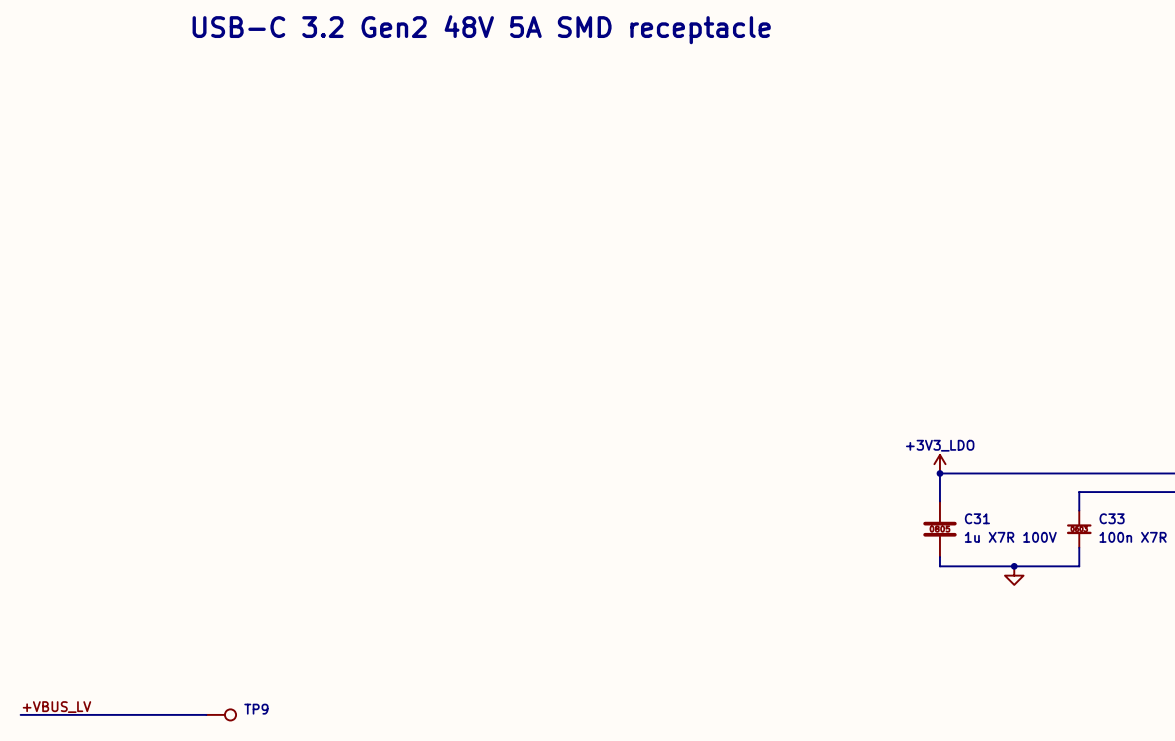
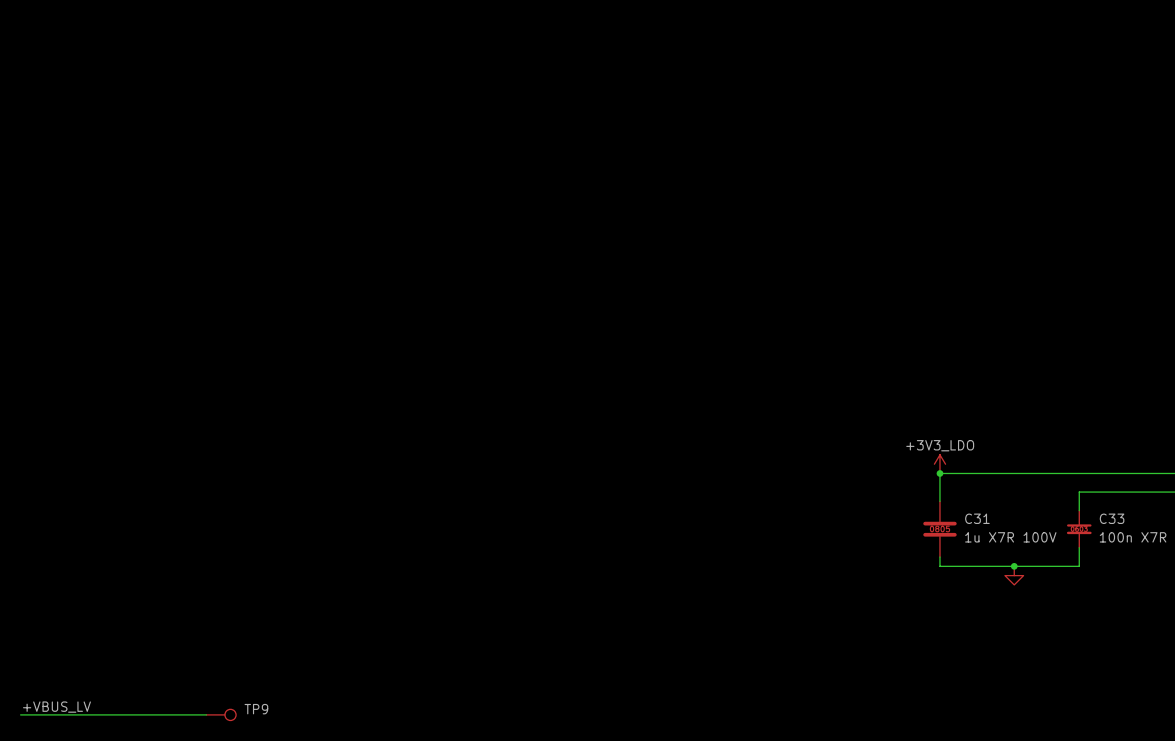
text: USB-C 3.2 Gen2 48V 5A SMD receptacle (481, 29) -> none

